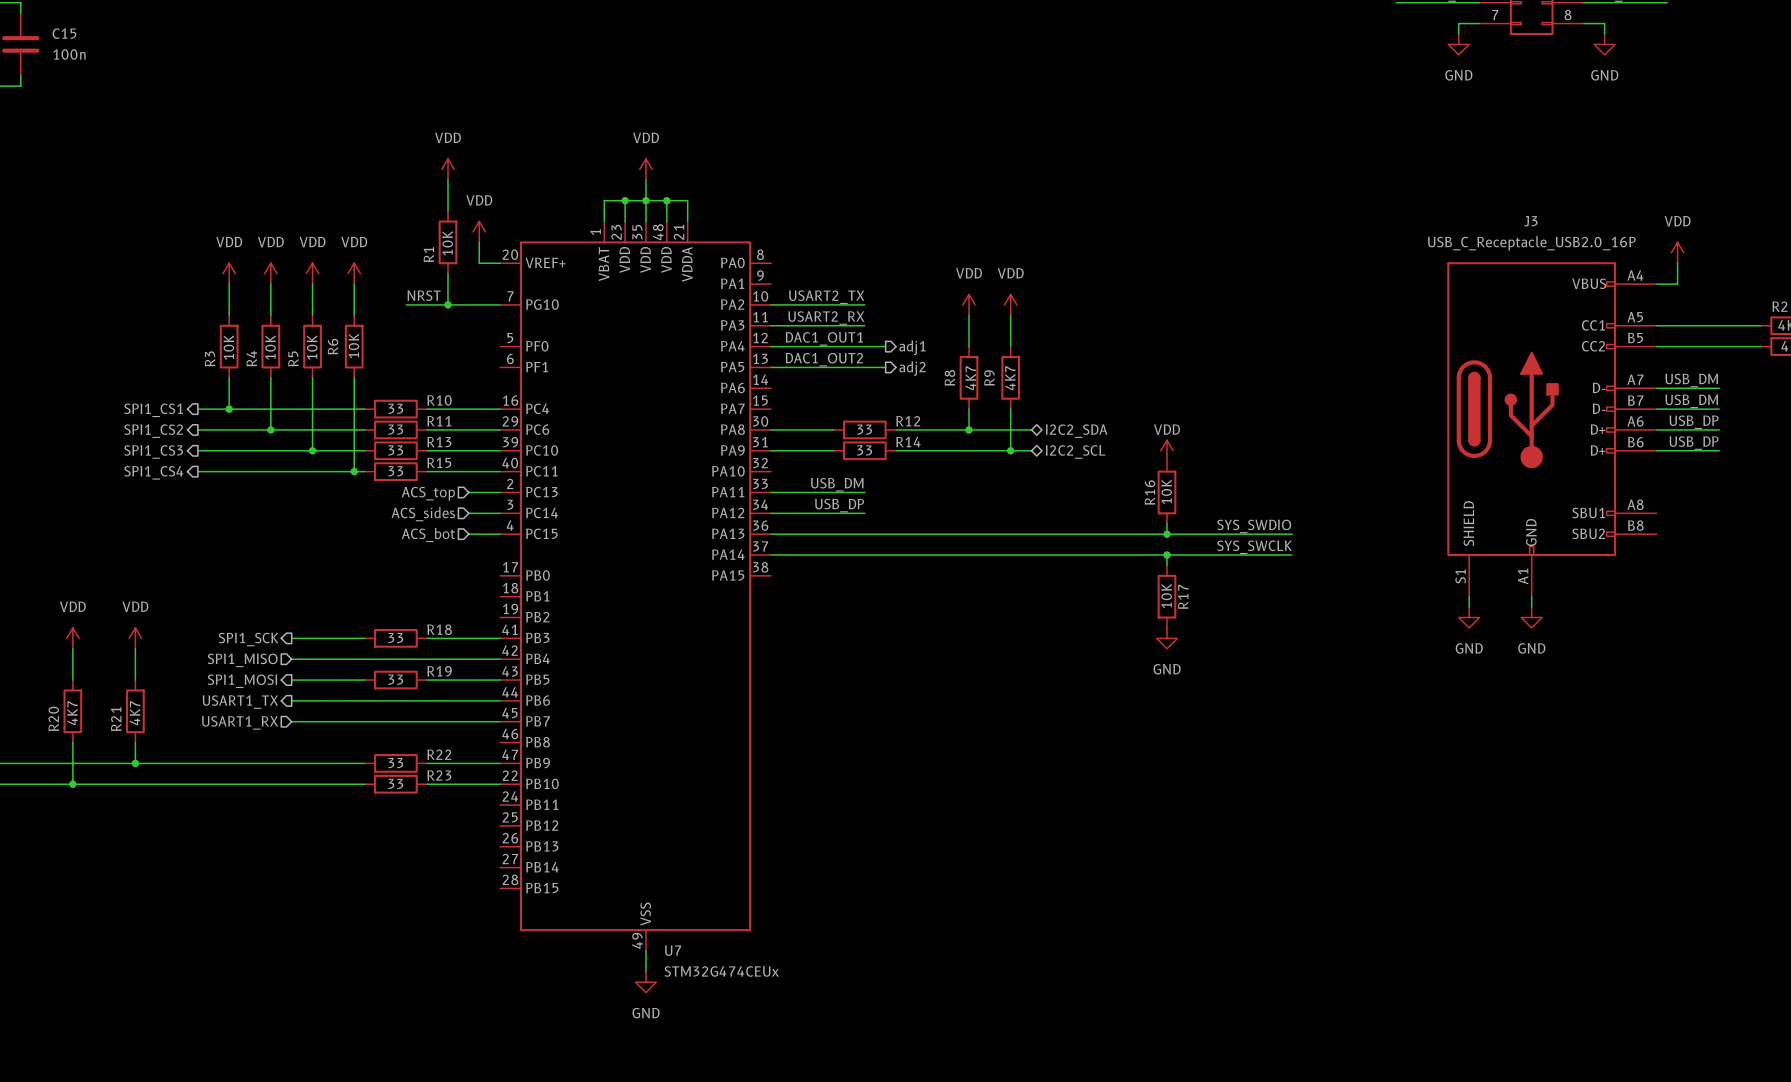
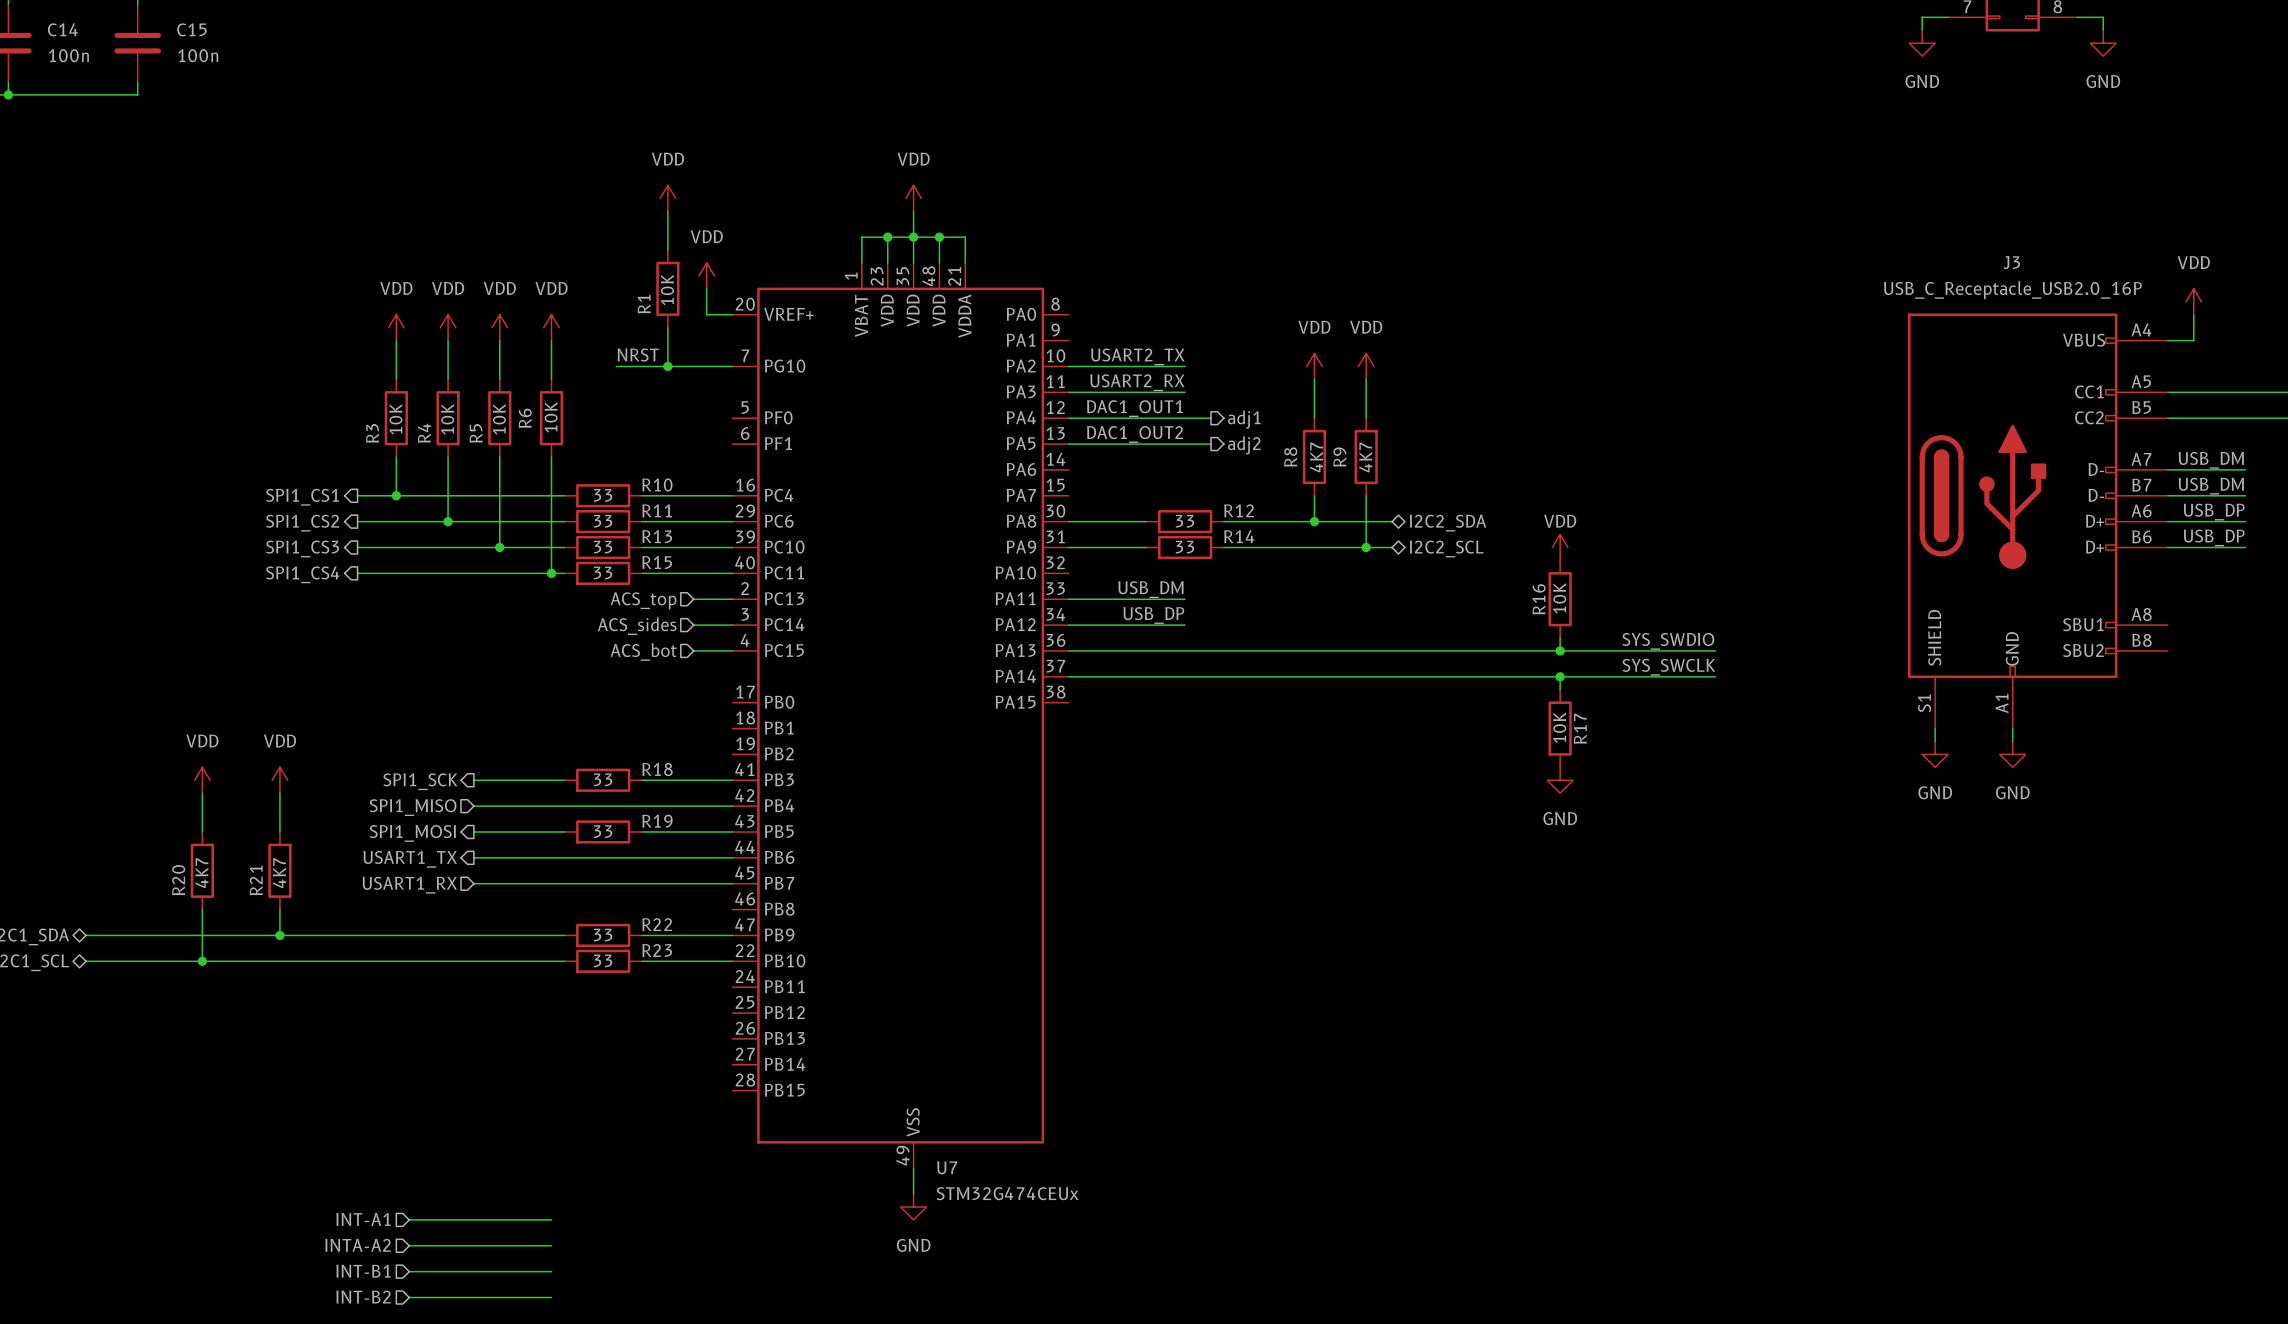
hierarchical label: none -> INT-A1 (363, 1219)
wire: none -> (409, 1219) (551, 1219)
hierarchical label: none -> INTA-A2 (358, 1245)
wire: none -> (409, 1245) (551, 1245)
hierarchical label: none -> INT-B1 (363, 1271)
wire: none -> (409, 1271) (551, 1271)
hierarchical label: none -> INT-B2 (363, 1297)
wire: none -> (409, 1297) (551, 1297)

